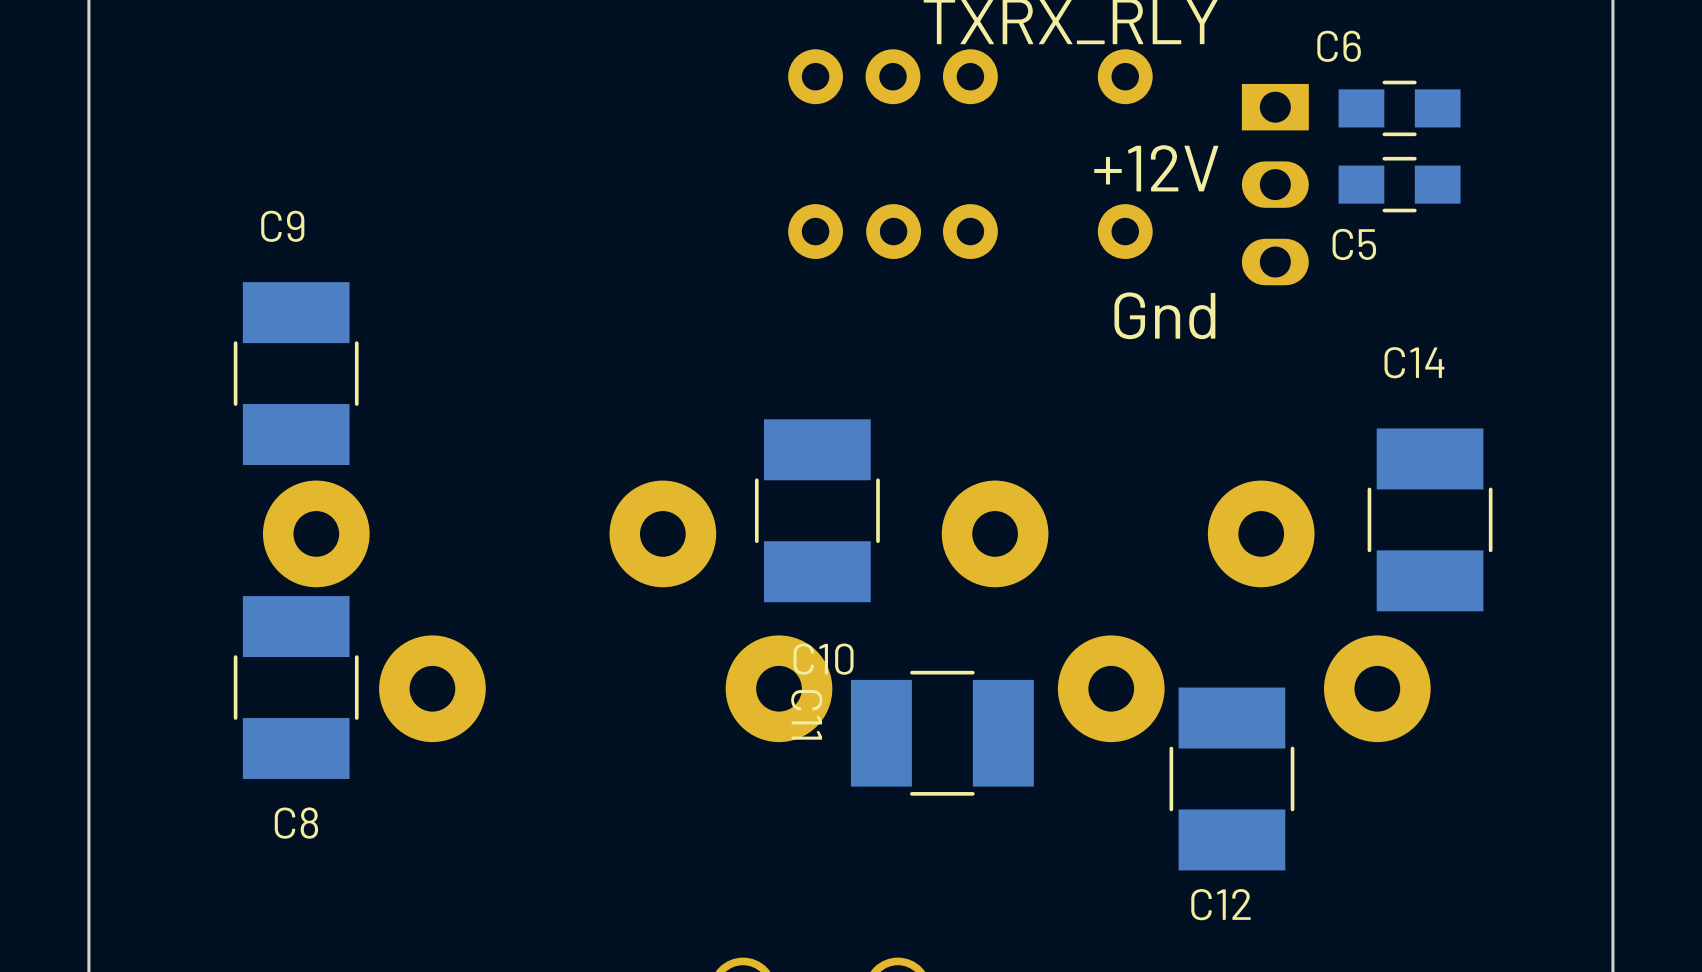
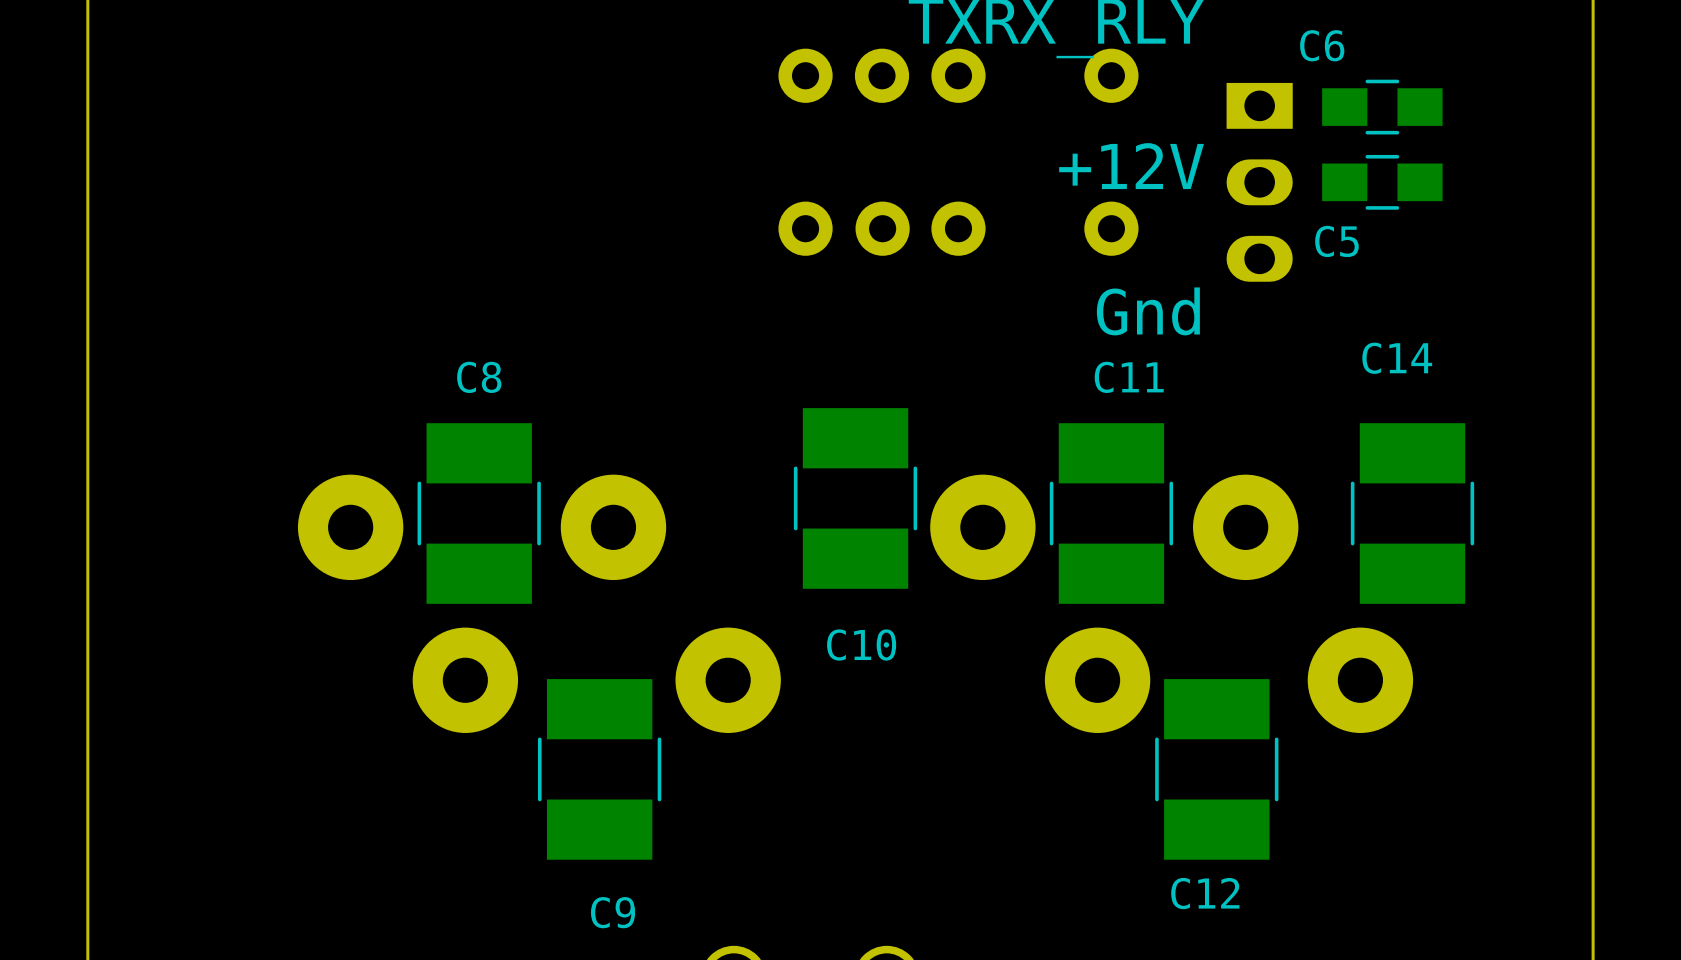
C9 name position: C9 (282, 226) -> C9 (613, 912)
C9 position: (296, 373) -> (599, 769)
C10 position: (817, 510) -> (855, 498)
part position: (374, 611) -> (408, 603)
part position: (720, 611) -> (670, 603)
C8 position: (296, 687) -> (479, 513)
C11 rotation: 0° (942, 733) -> 90° clockwise (1111, 513)
C11 position: (942, 733) -> (1111, 513)
C8 name position: C8 (296, 823) -> C8 (479, 377)

